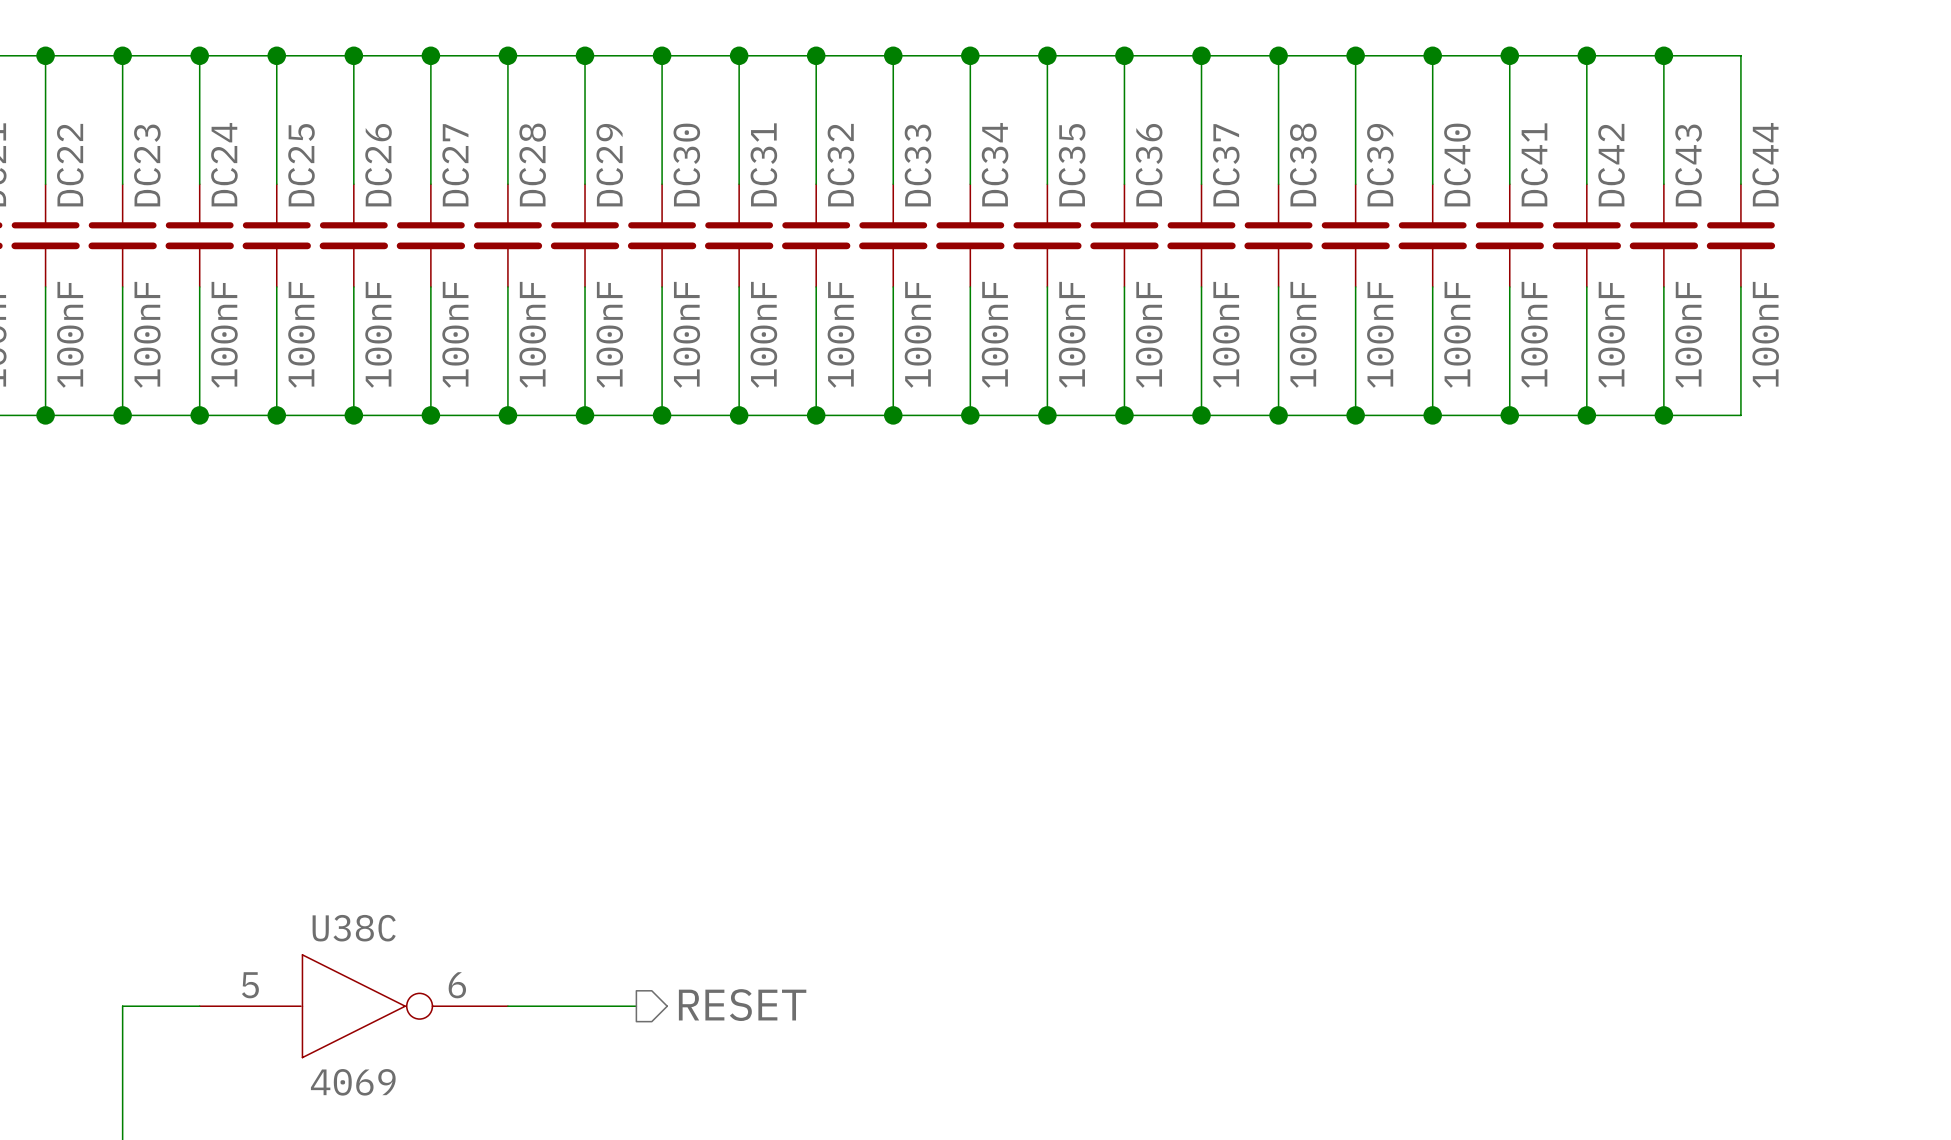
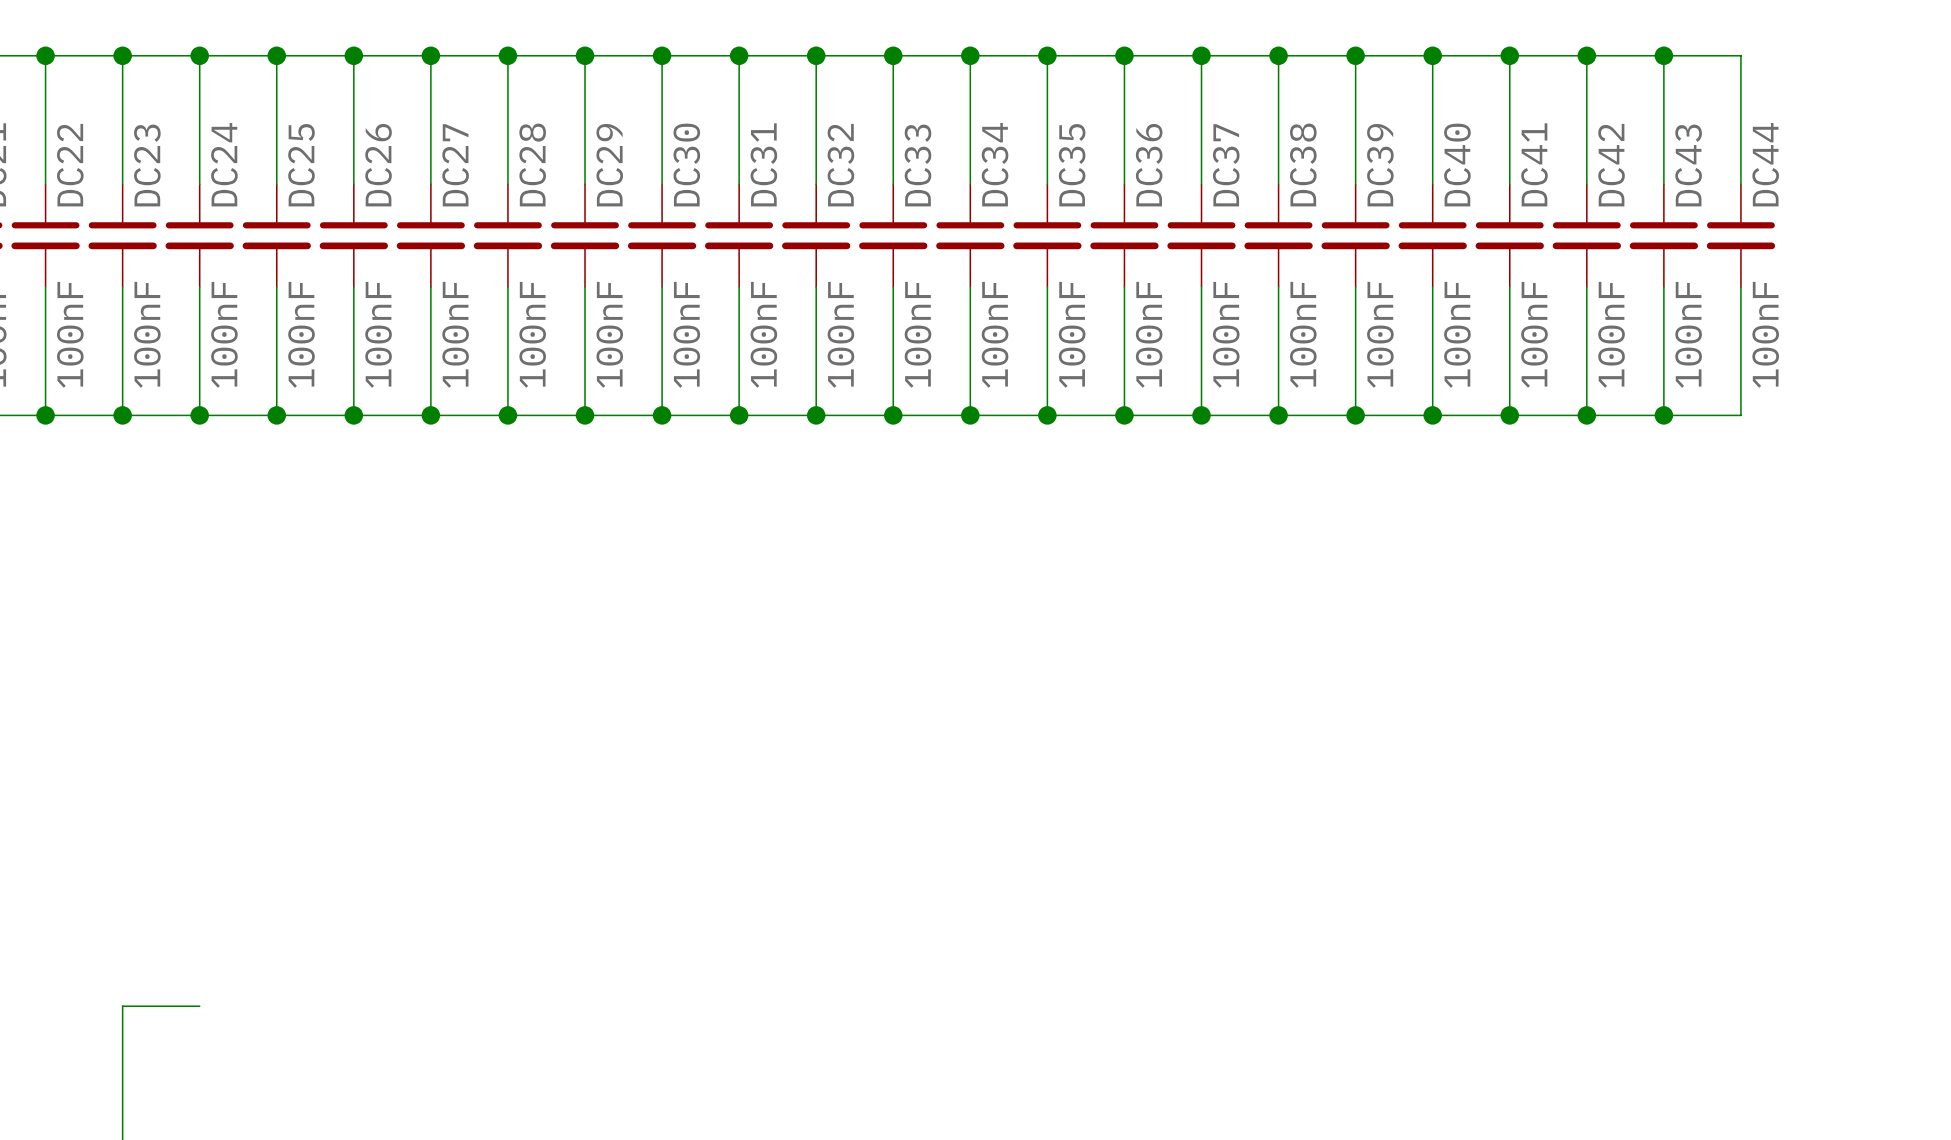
hierarchical label: RESET (742, 1005) -> none
U38C: 4069 (353, 1006) -> none
wire: (507, 1006) (636, 1006) -> none

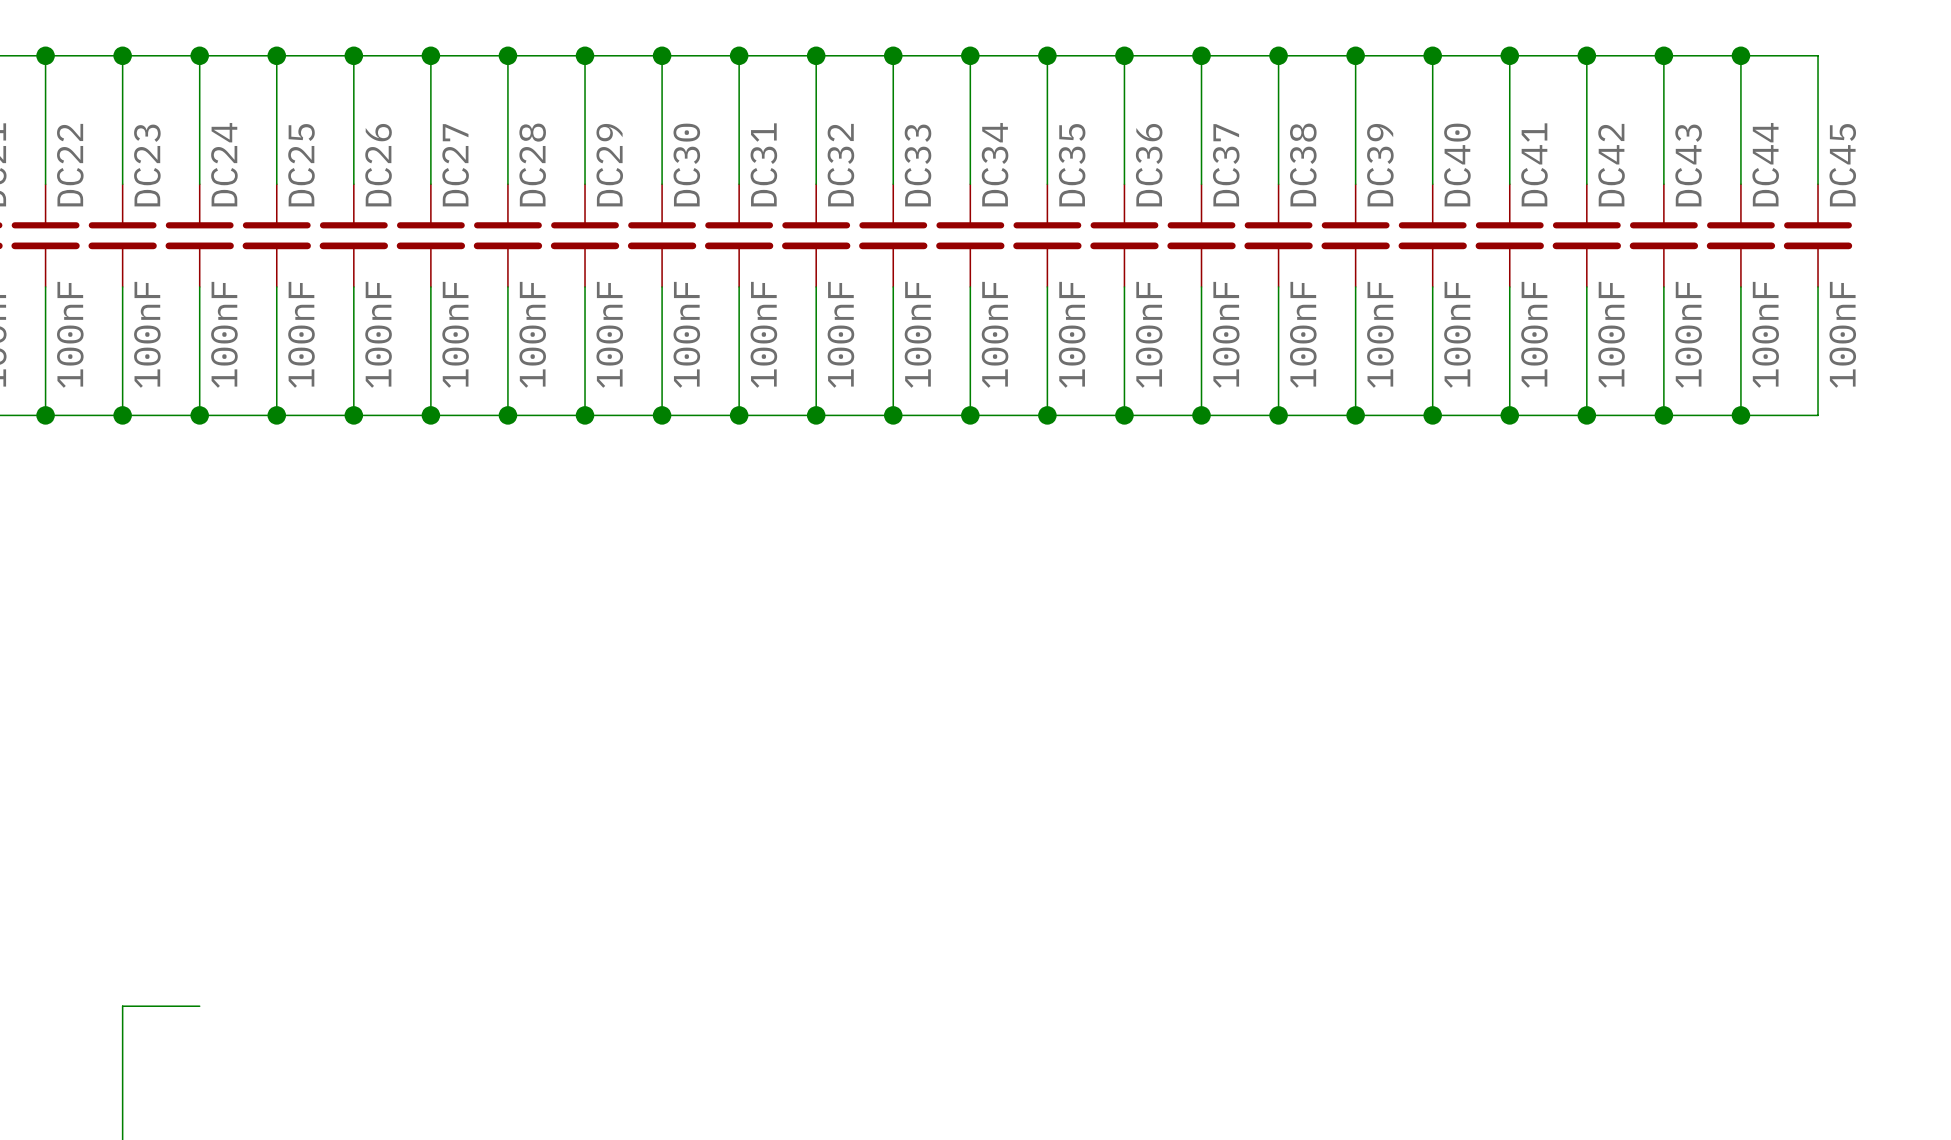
wire: none -> (1740, 55) (1818, 55) (1818, 184)
junction: none -> (1740, 55)
DC45: none -> 100nF (1818, 235)
wire: none -> (1818, 286) (1818, 415) (1740, 415)
junction: none -> (1740, 415)

